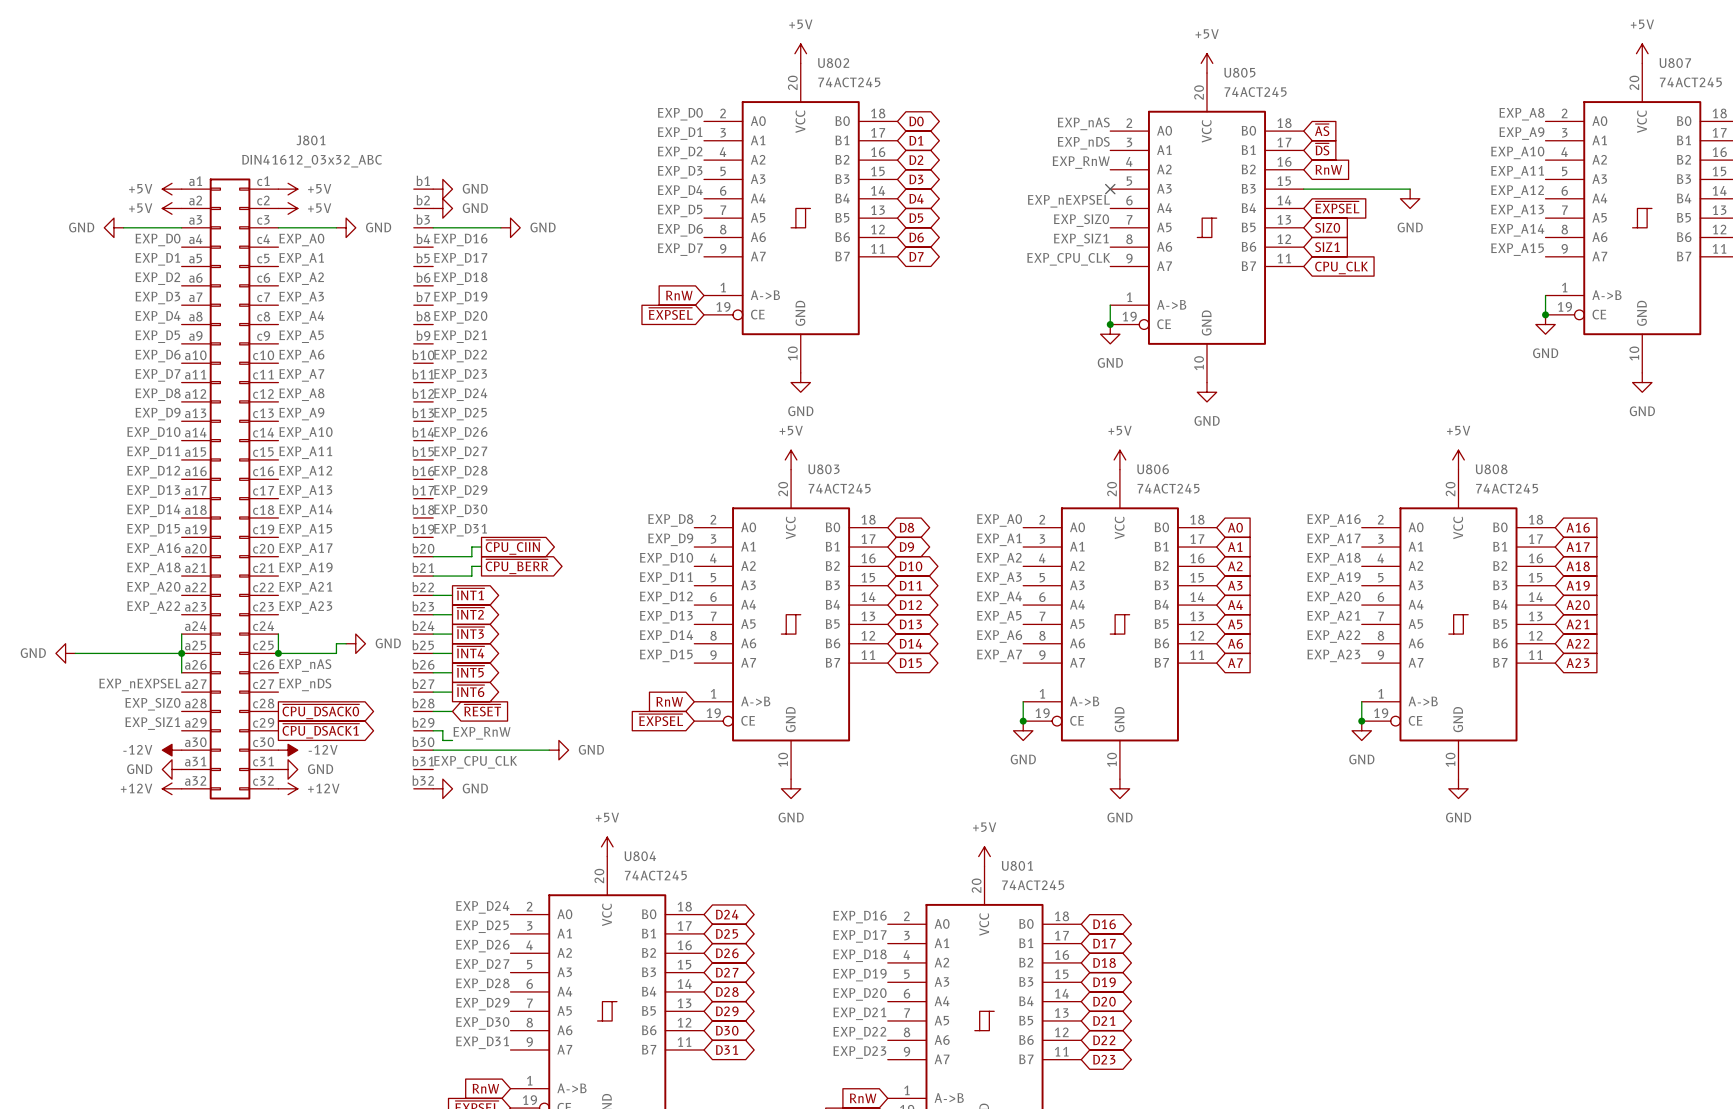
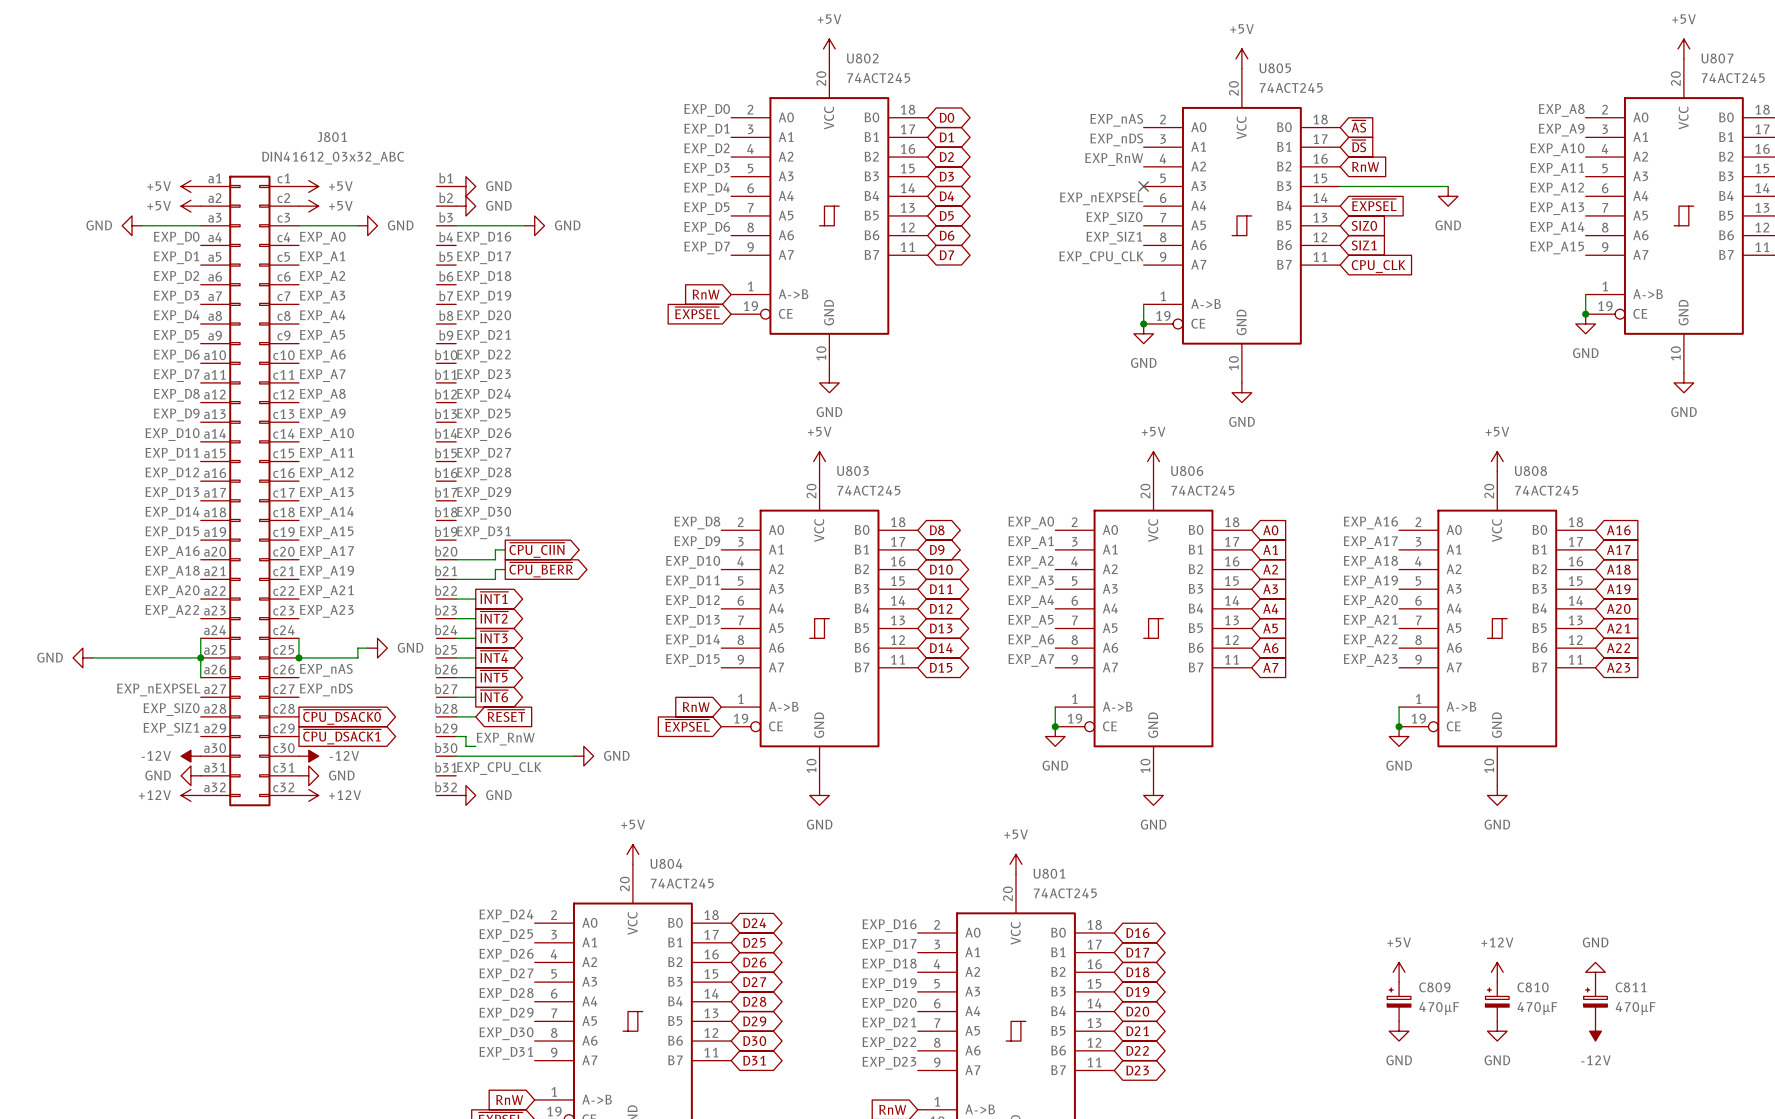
power symbol: none -> +5V (1399, 972)
power symbol: none -> +12V (1497, 972)
power symbol: none -> GND (1595, 972)
C809: none -> 470µF (1399, 1001)
C810: none -> 470µF (1497, 1001)
C811: none -> 470µF (1595, 1001)
power symbol: none -> GND (1399, 1031)
power symbol: none -> GND (1497, 1031)
power symbol: none -> -12V (1595, 1031)

